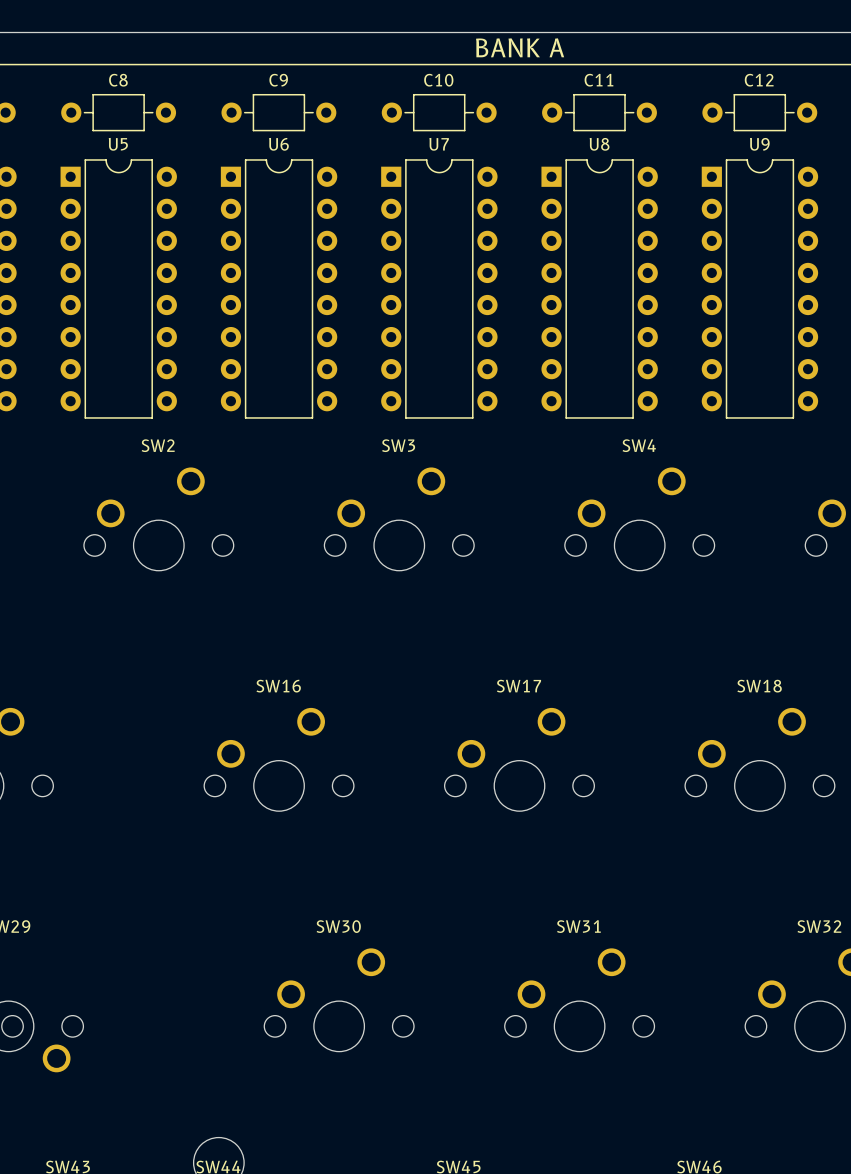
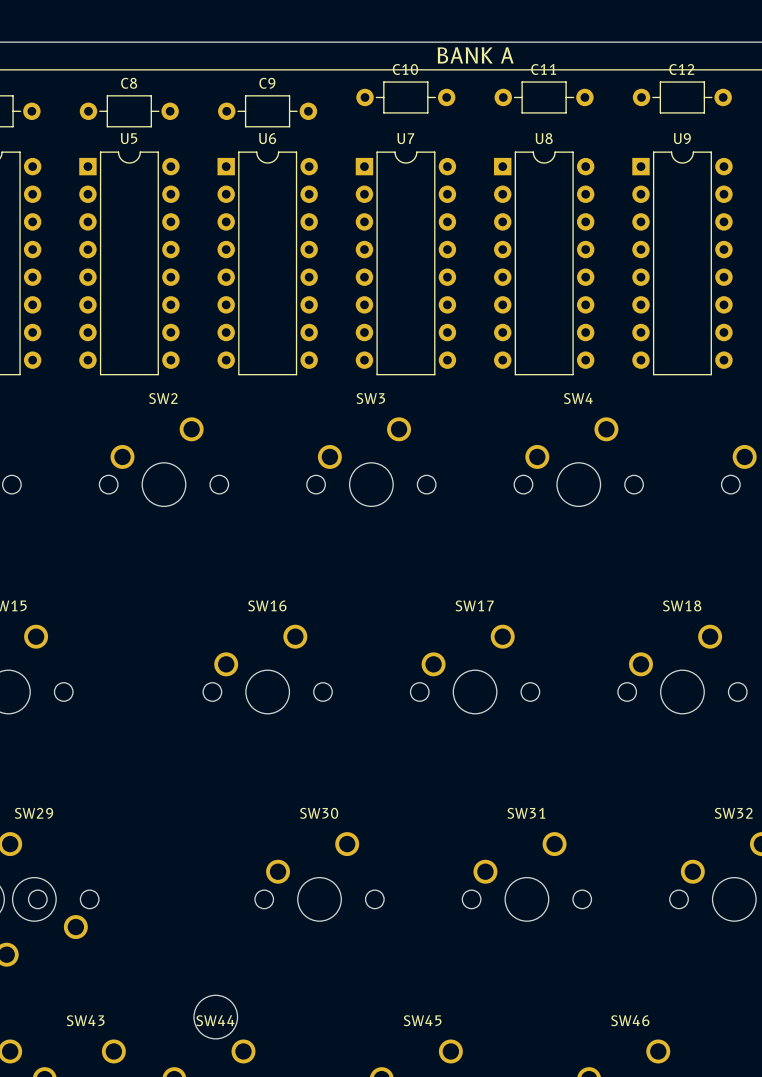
C10 position: (439, 112) -> (405, 97)
C11 position: (599, 112) -> (544, 97)
C12 position: (759, 112) -> (682, 97)

